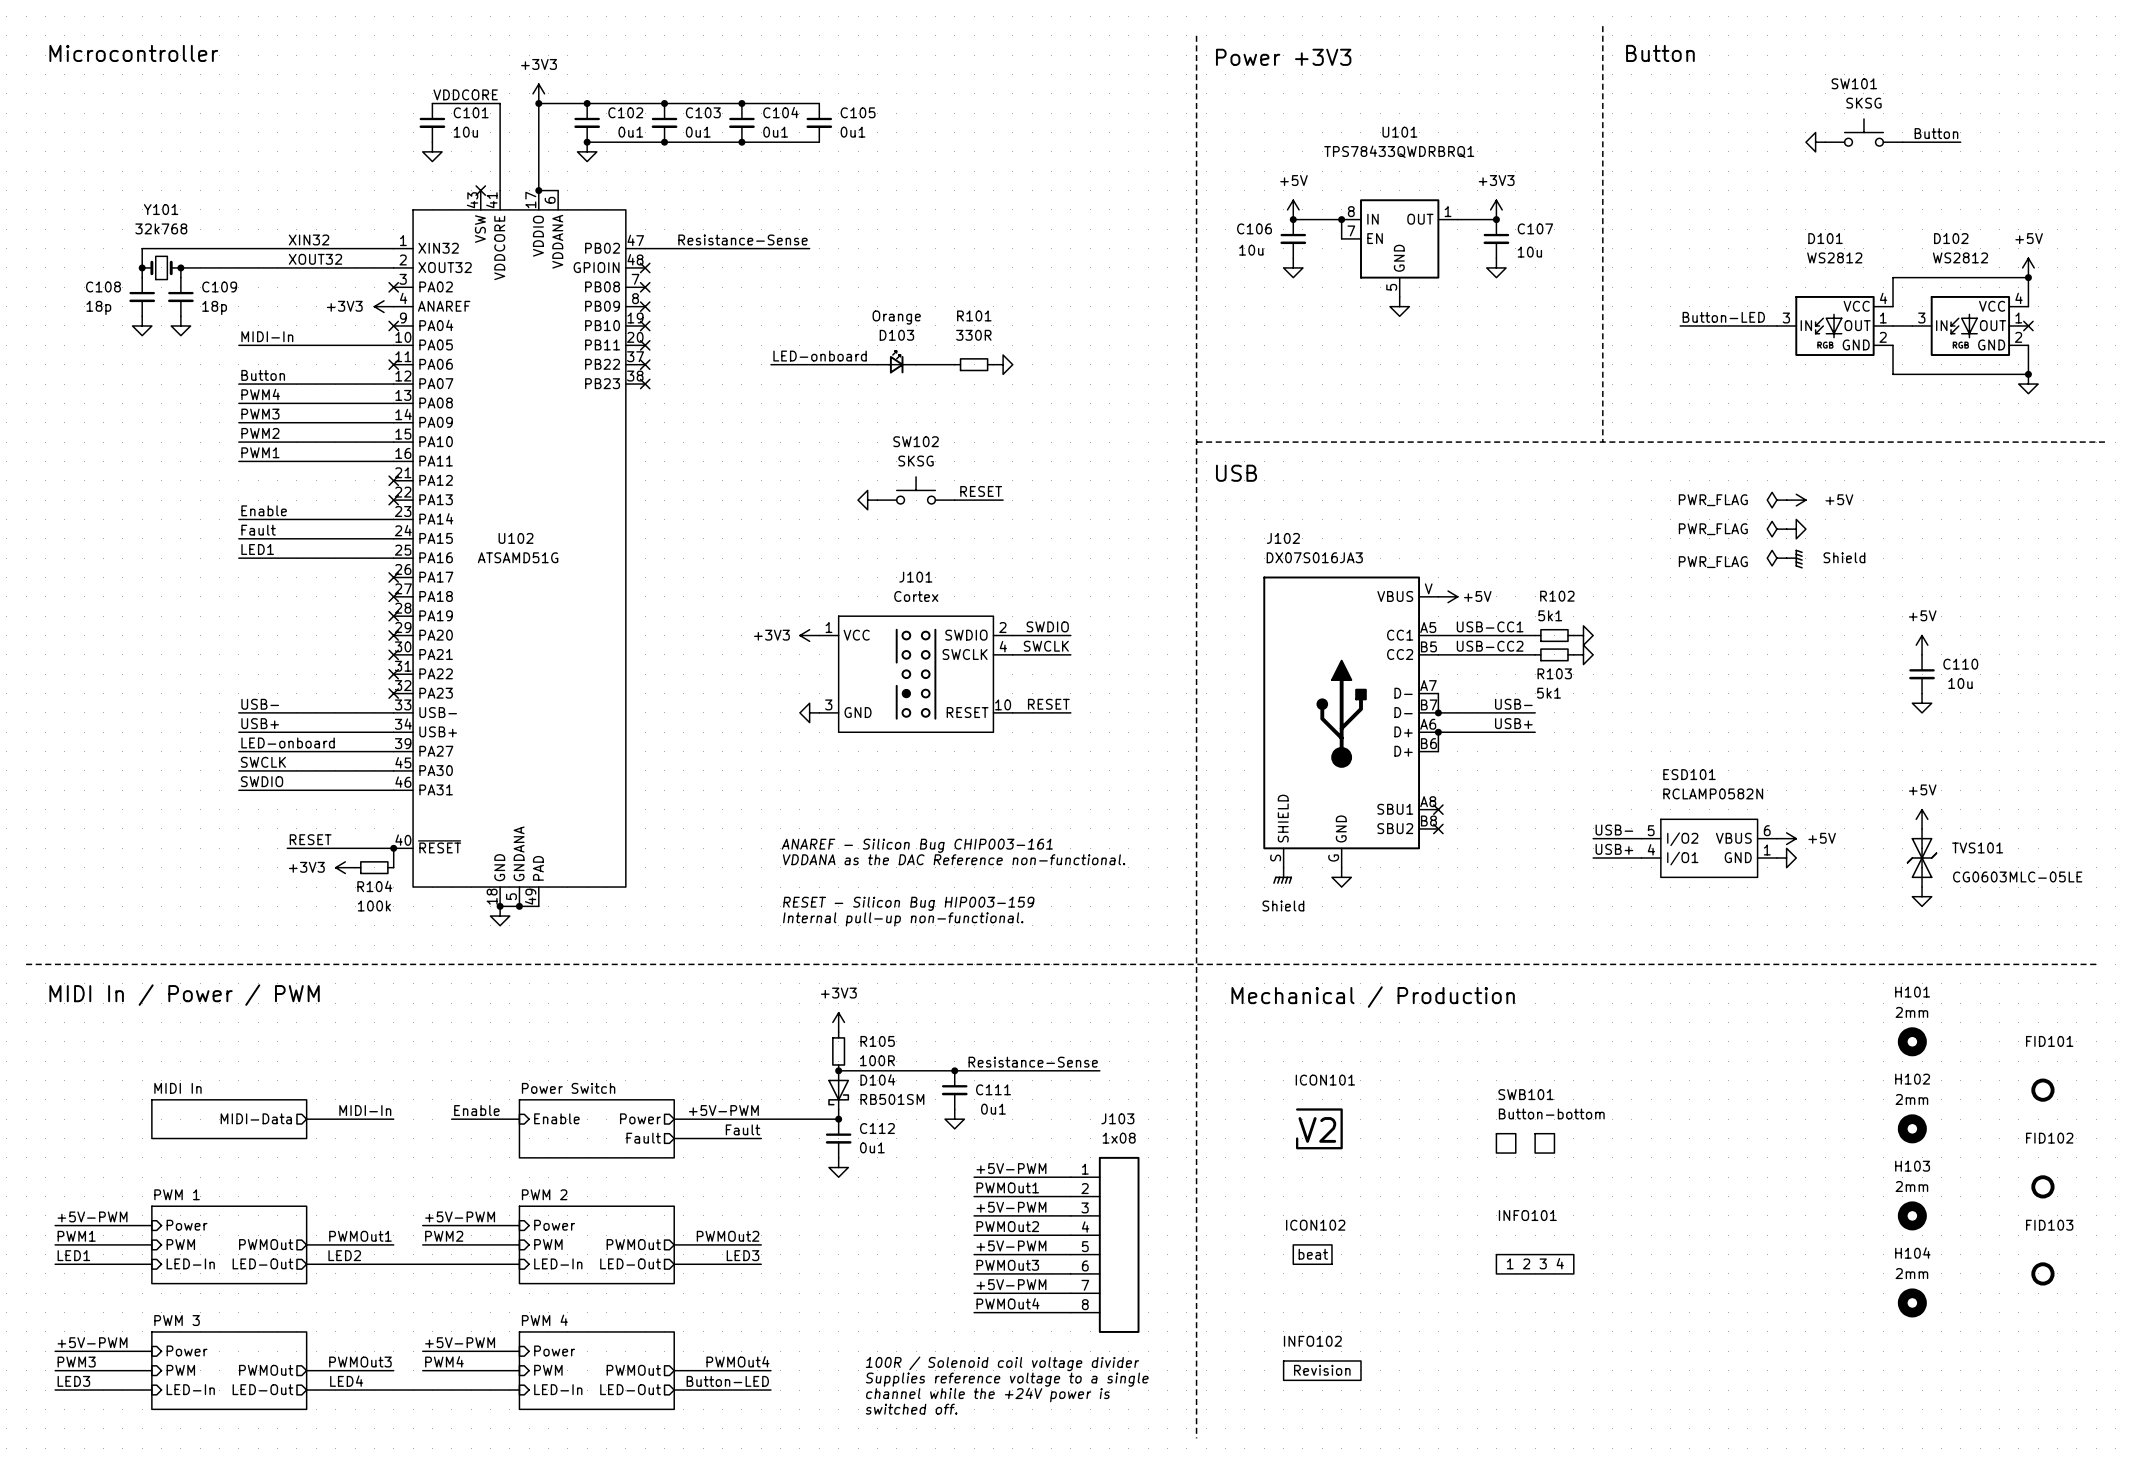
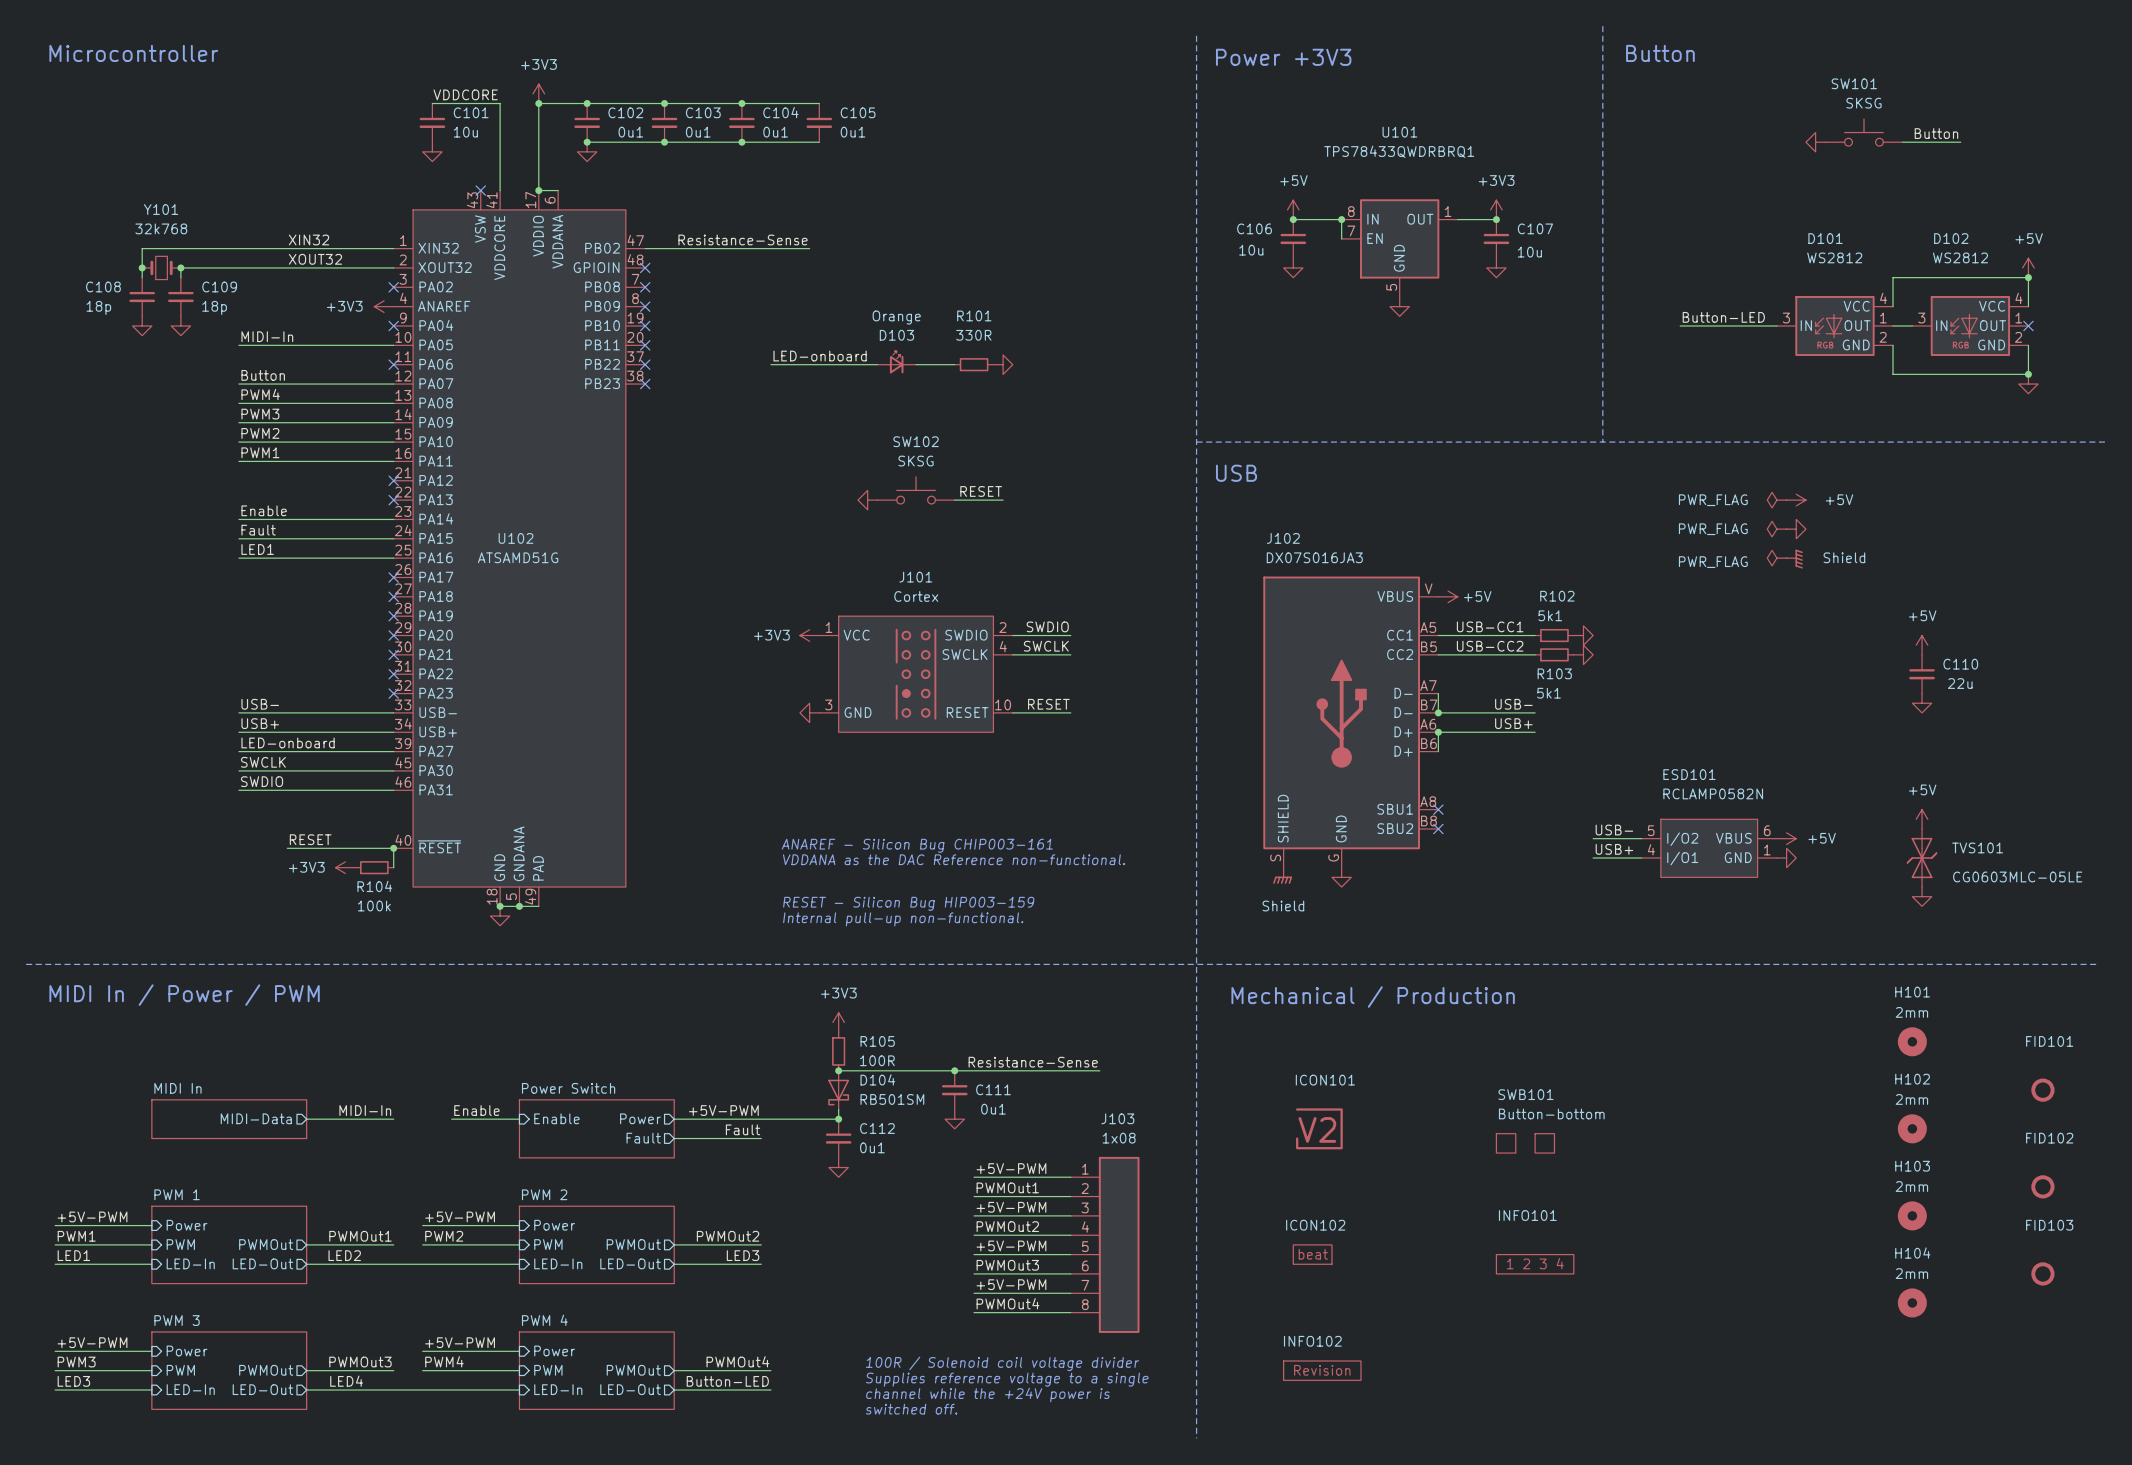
C110 value: 10u (1960, 683) -> 22u (1960, 683)

